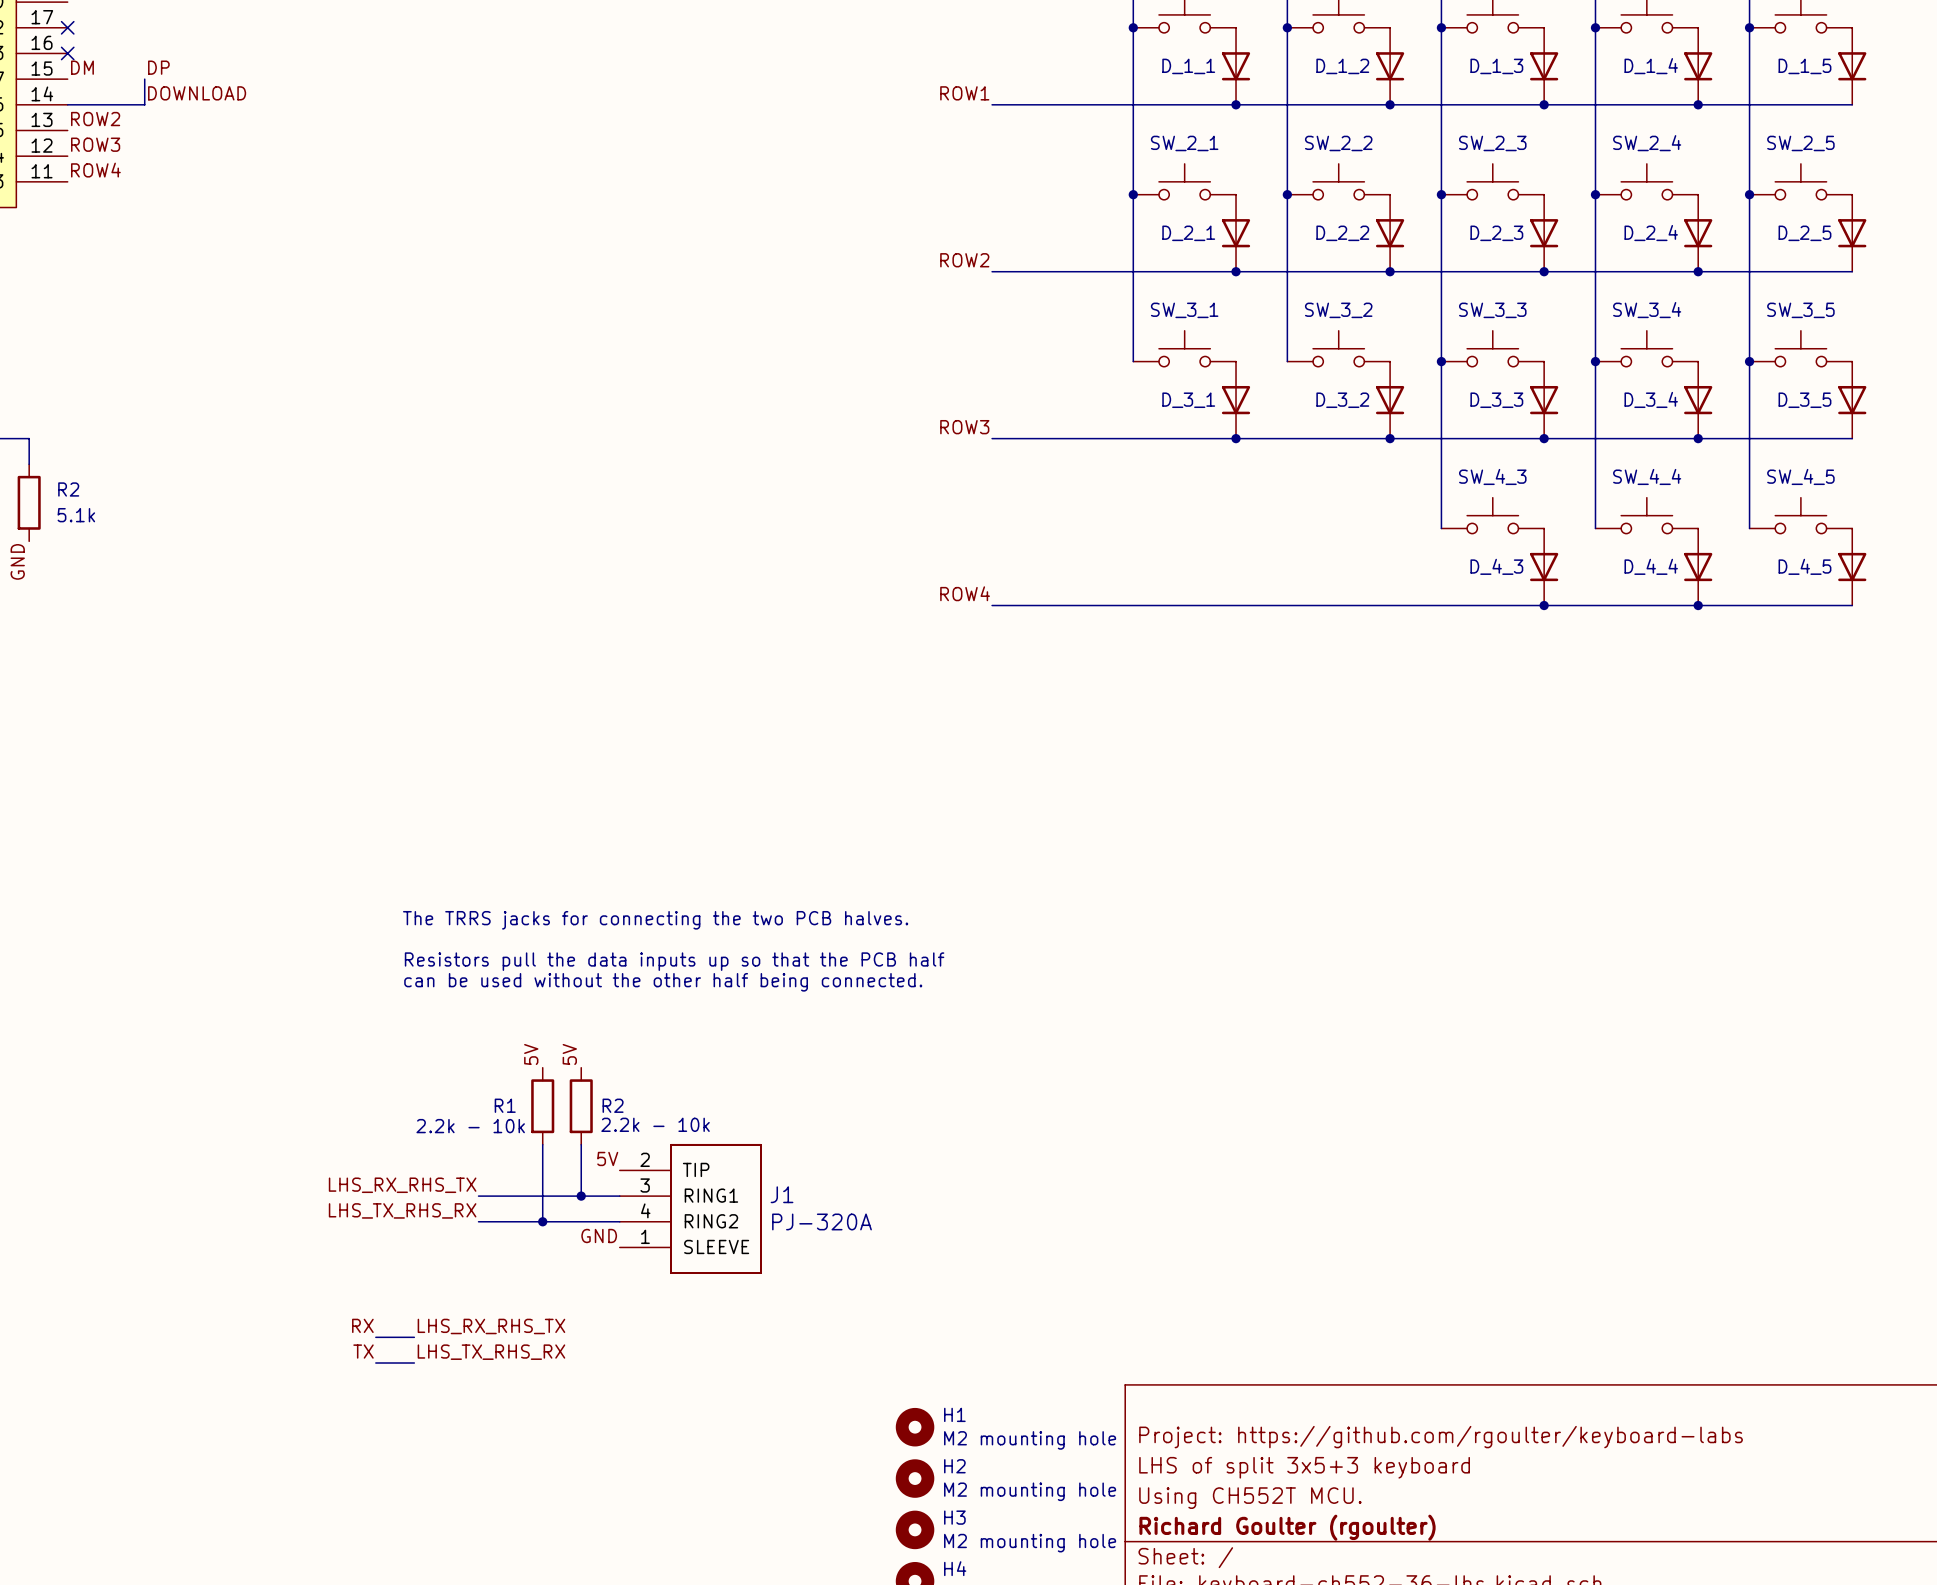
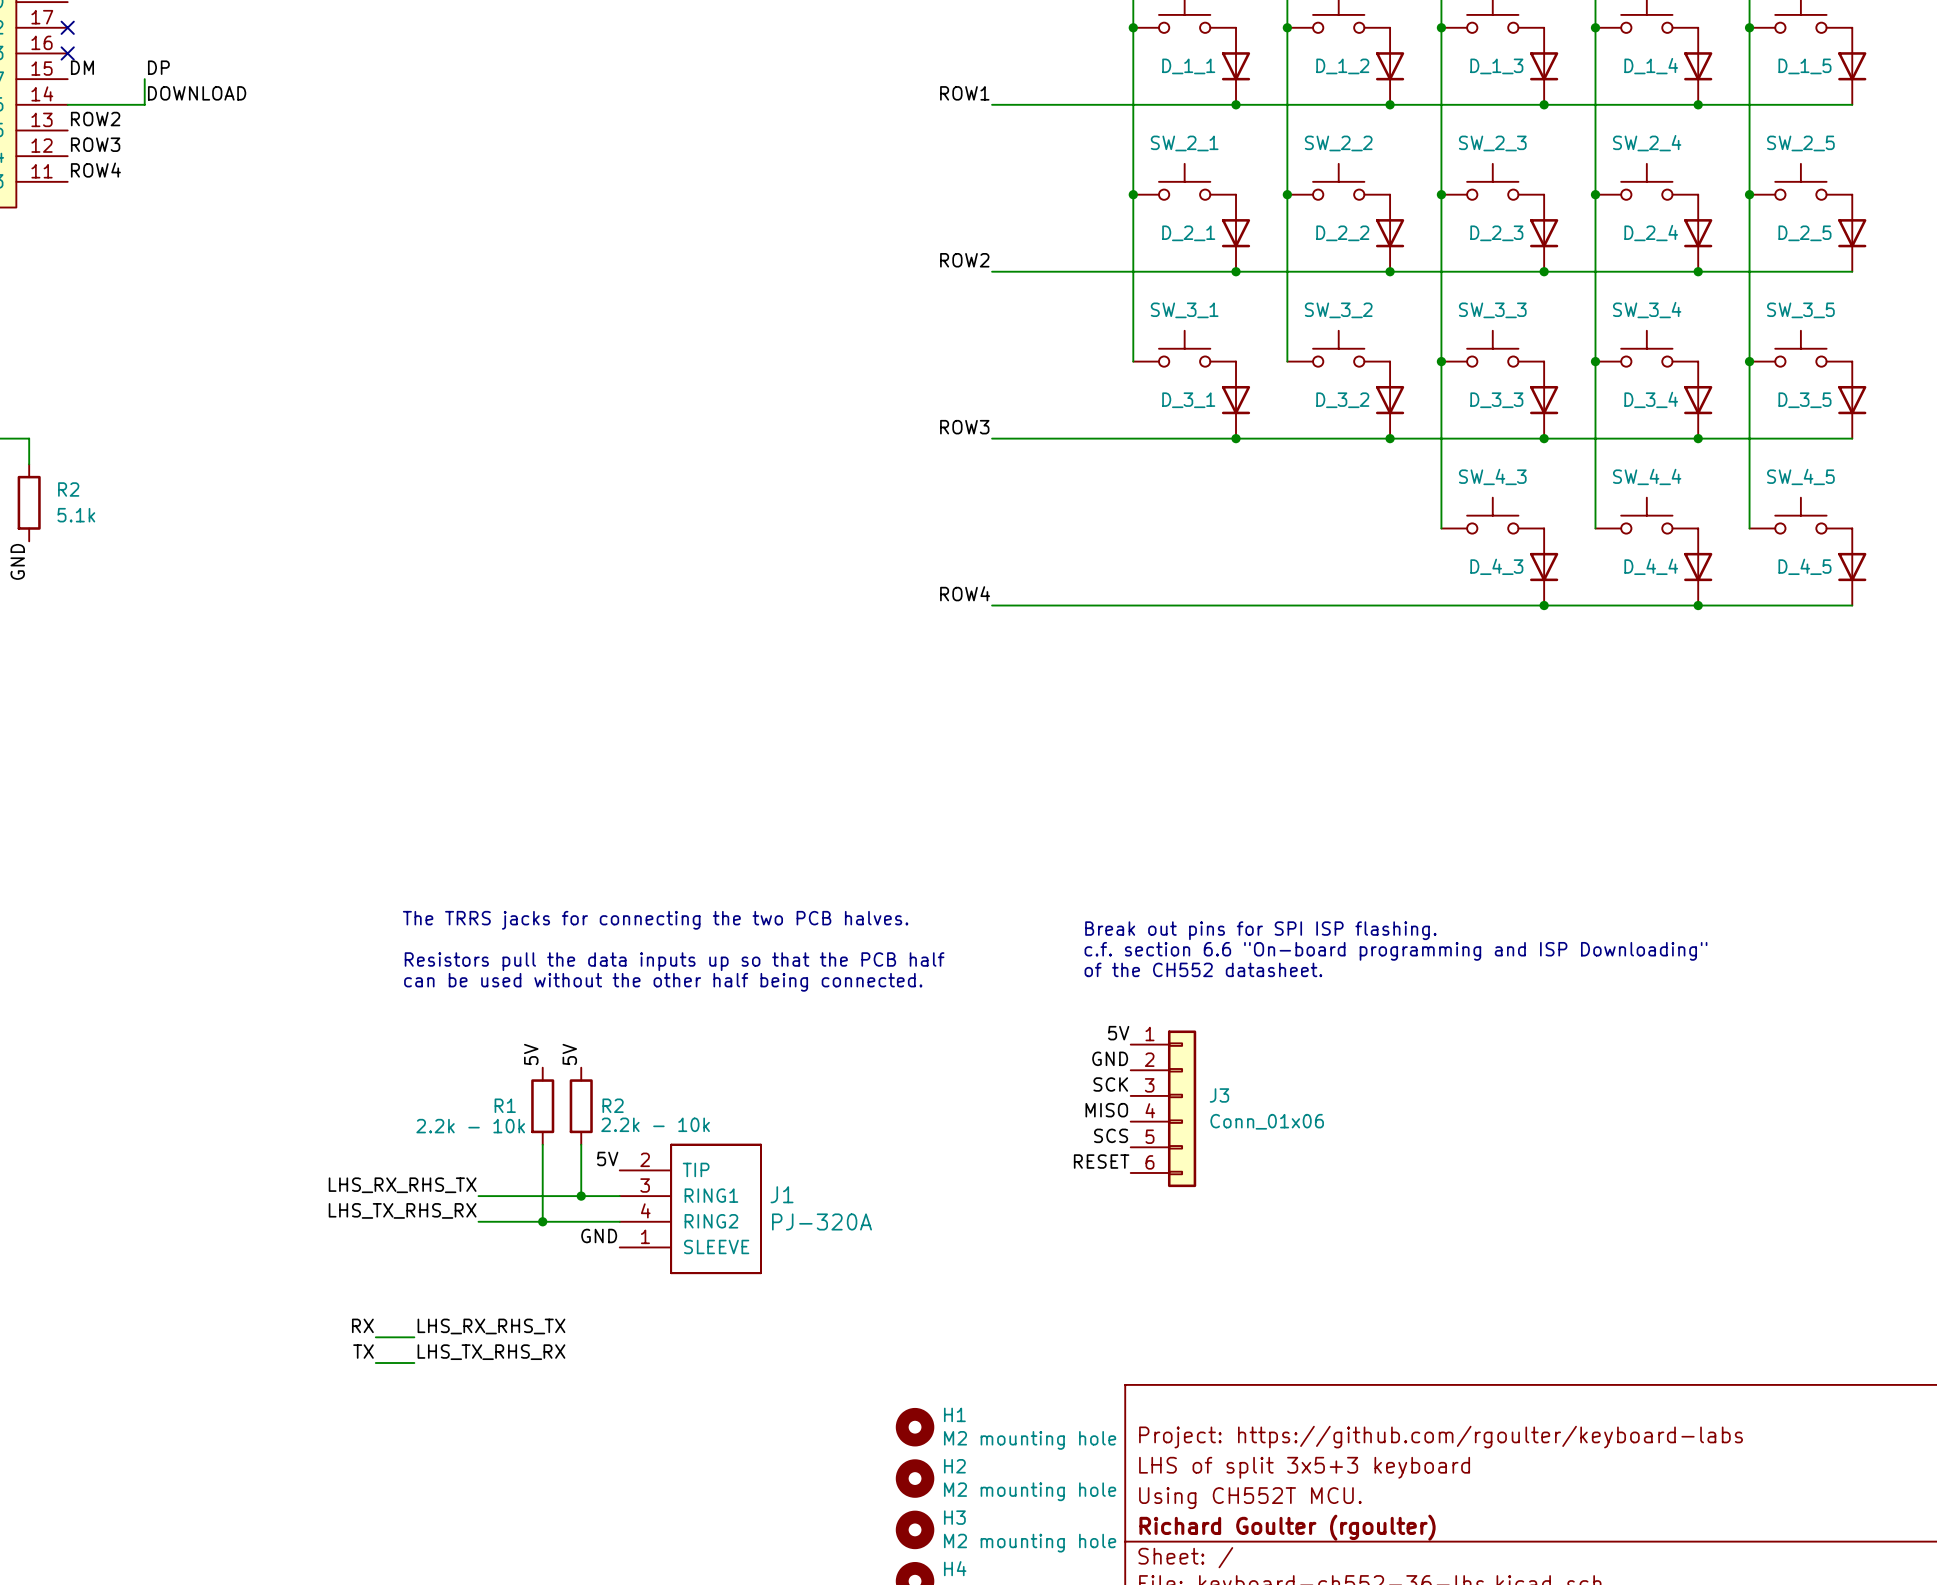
text: none -> Break out pins for SPI ISP flashing. (1260, 930)
text: none -> c.f. section 6.6 "On-board programming and ISP Downloading" (1395, 951)
text: none -> of the CH552 datasheet. (1203, 969)
label: none -> 5V (1118, 1033)
label: none -> GND (1110, 1058)
label: none -> SCK (1110, 1084)
J3: none -> Conn_01x06 (1163, 1108)
label: none -> MISO (1106, 1110)
label: none -> SCS (1111, 1135)
label: none -> RESET (1101, 1161)

